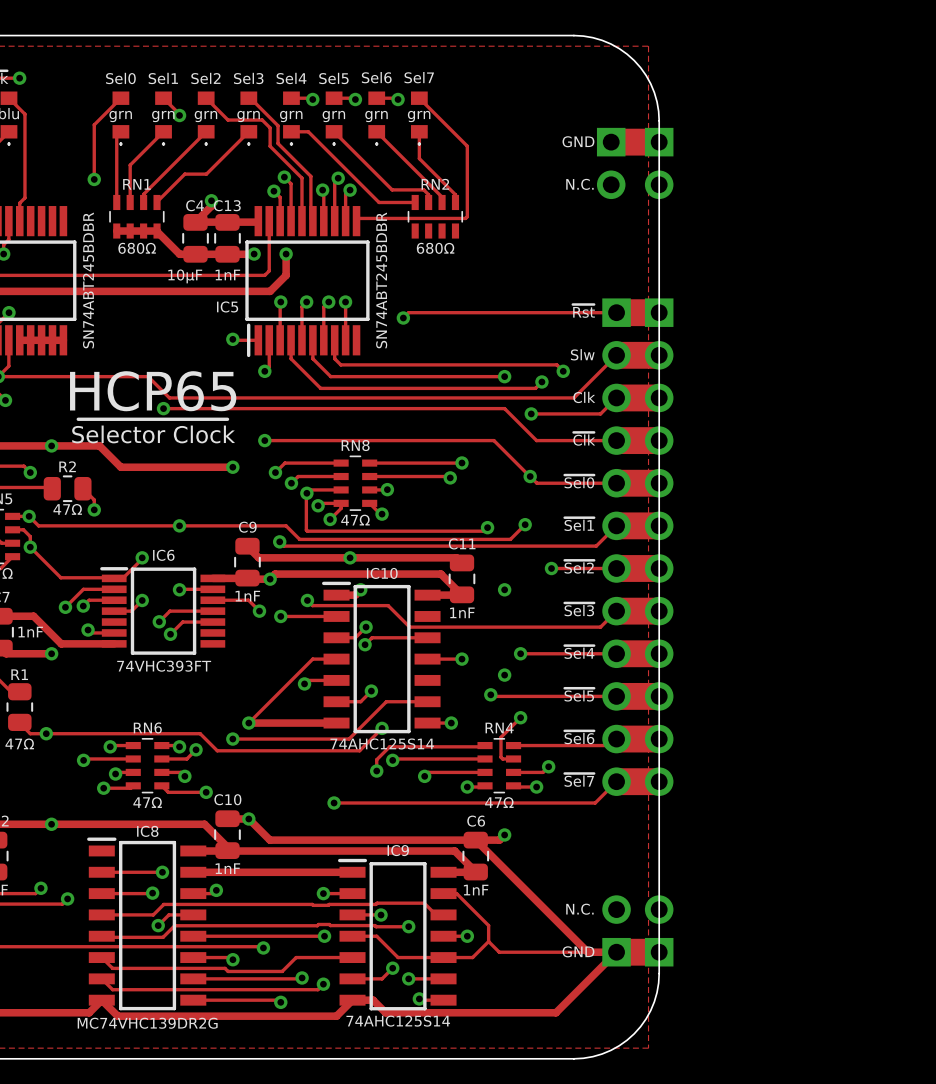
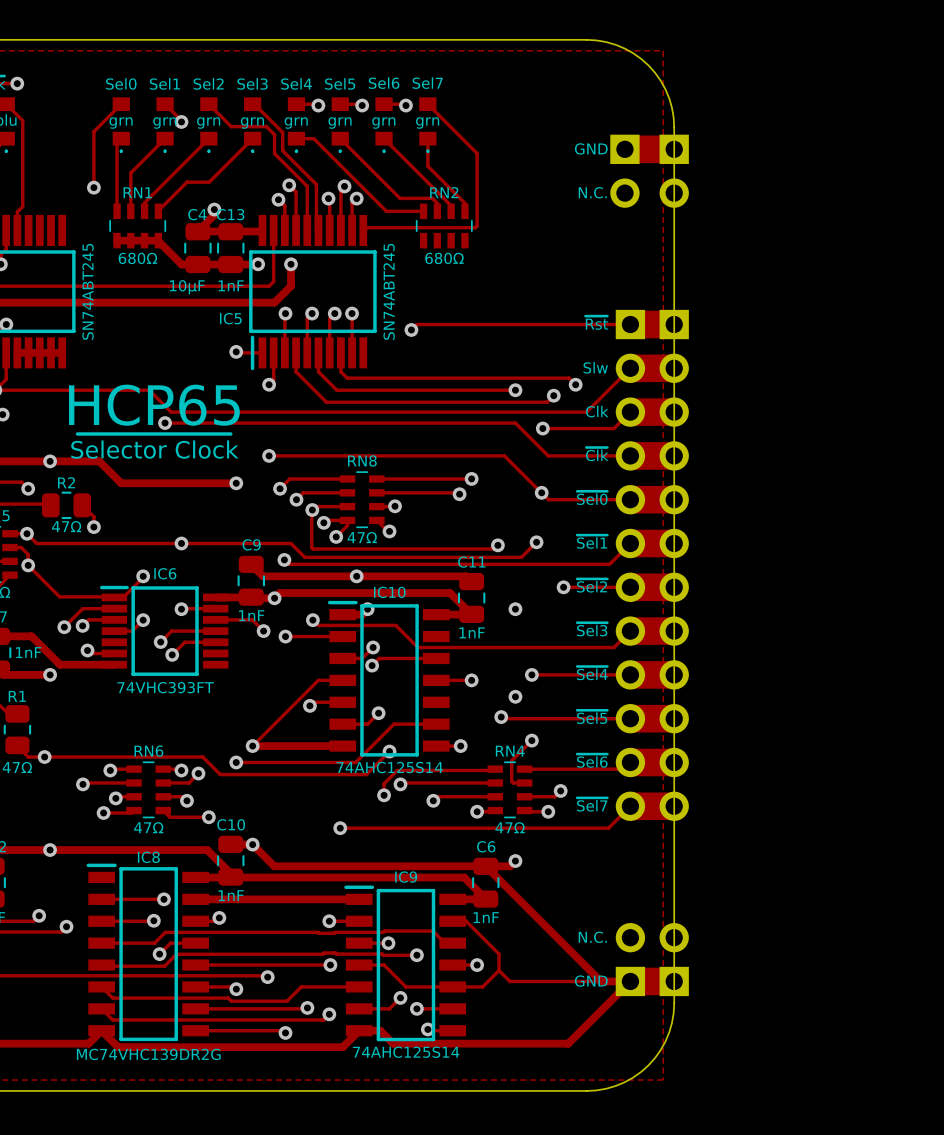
part value: SN74ABT245BDBR (88, 280) -> SN74ABT245 (88, 291)
IC5 value: SN74ABT245BDBR (381, 280) -> SN74ABT245 (389, 291)

